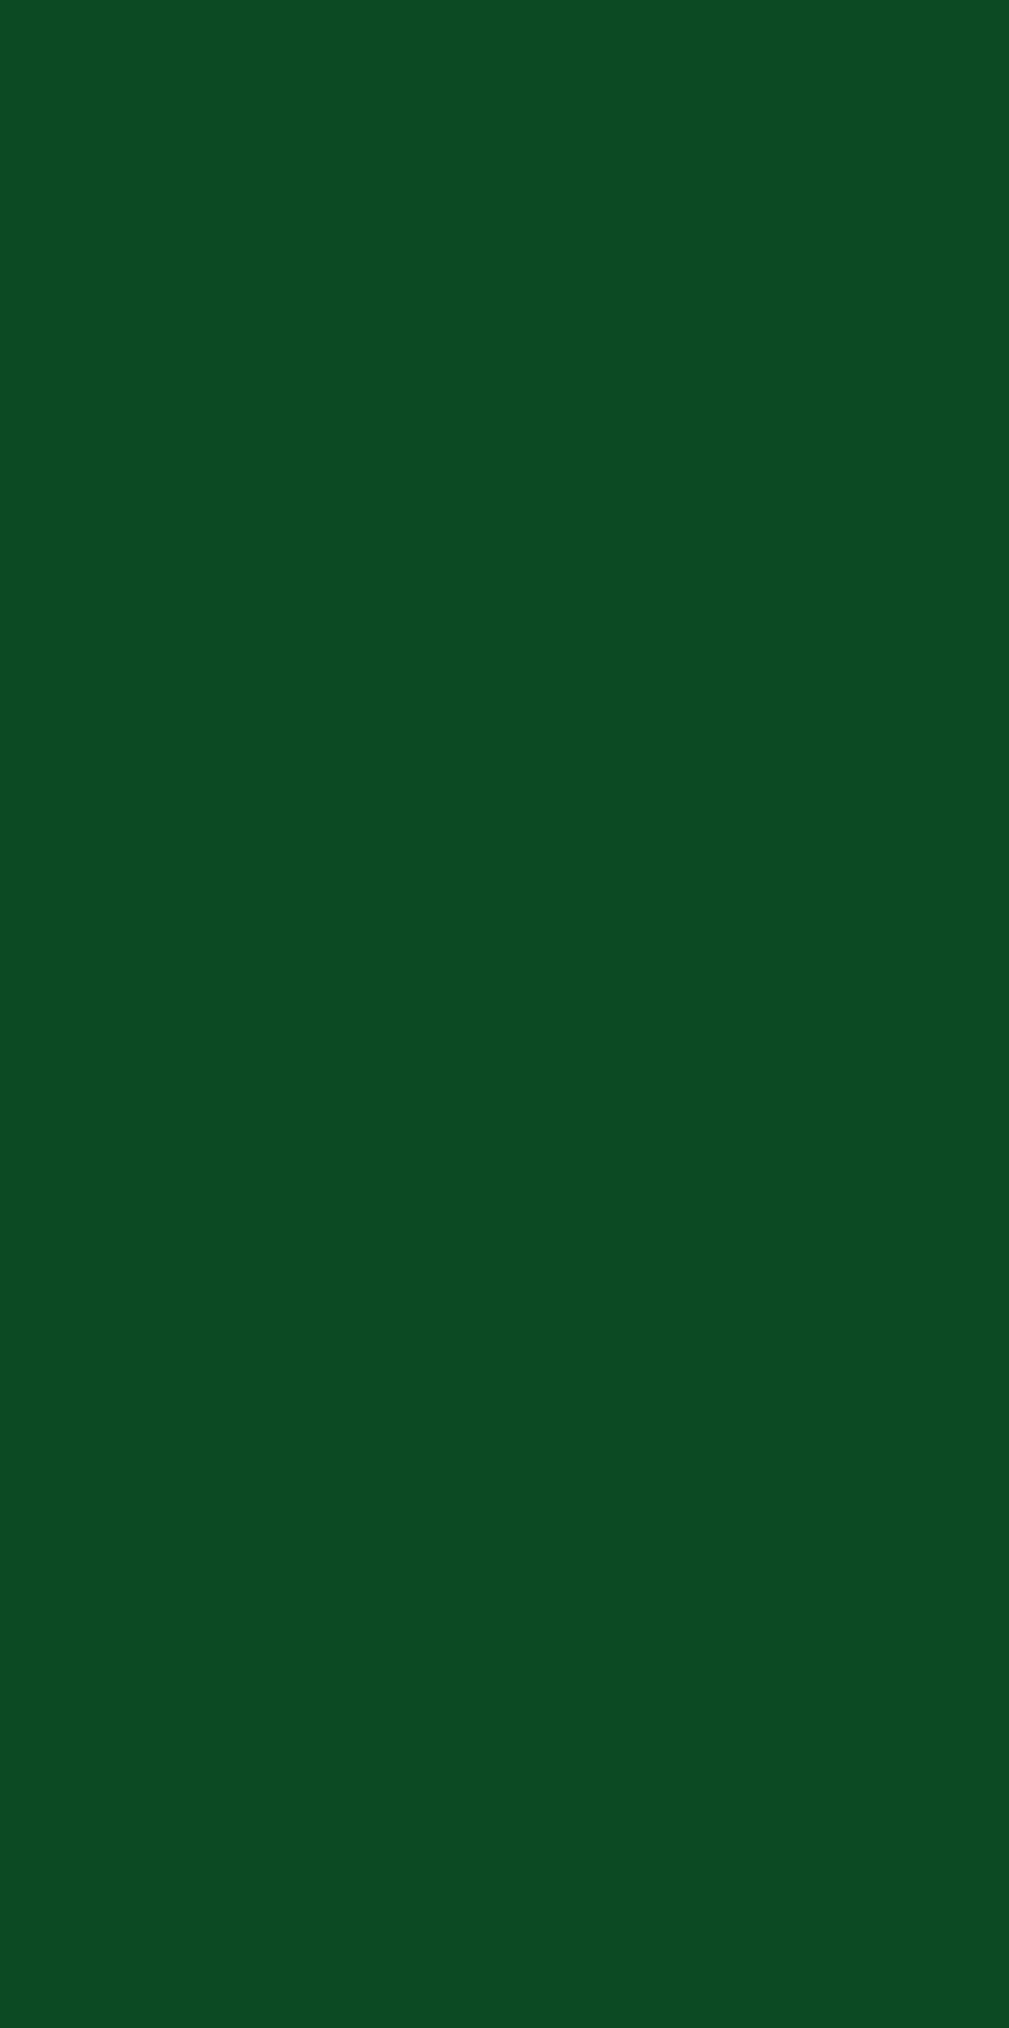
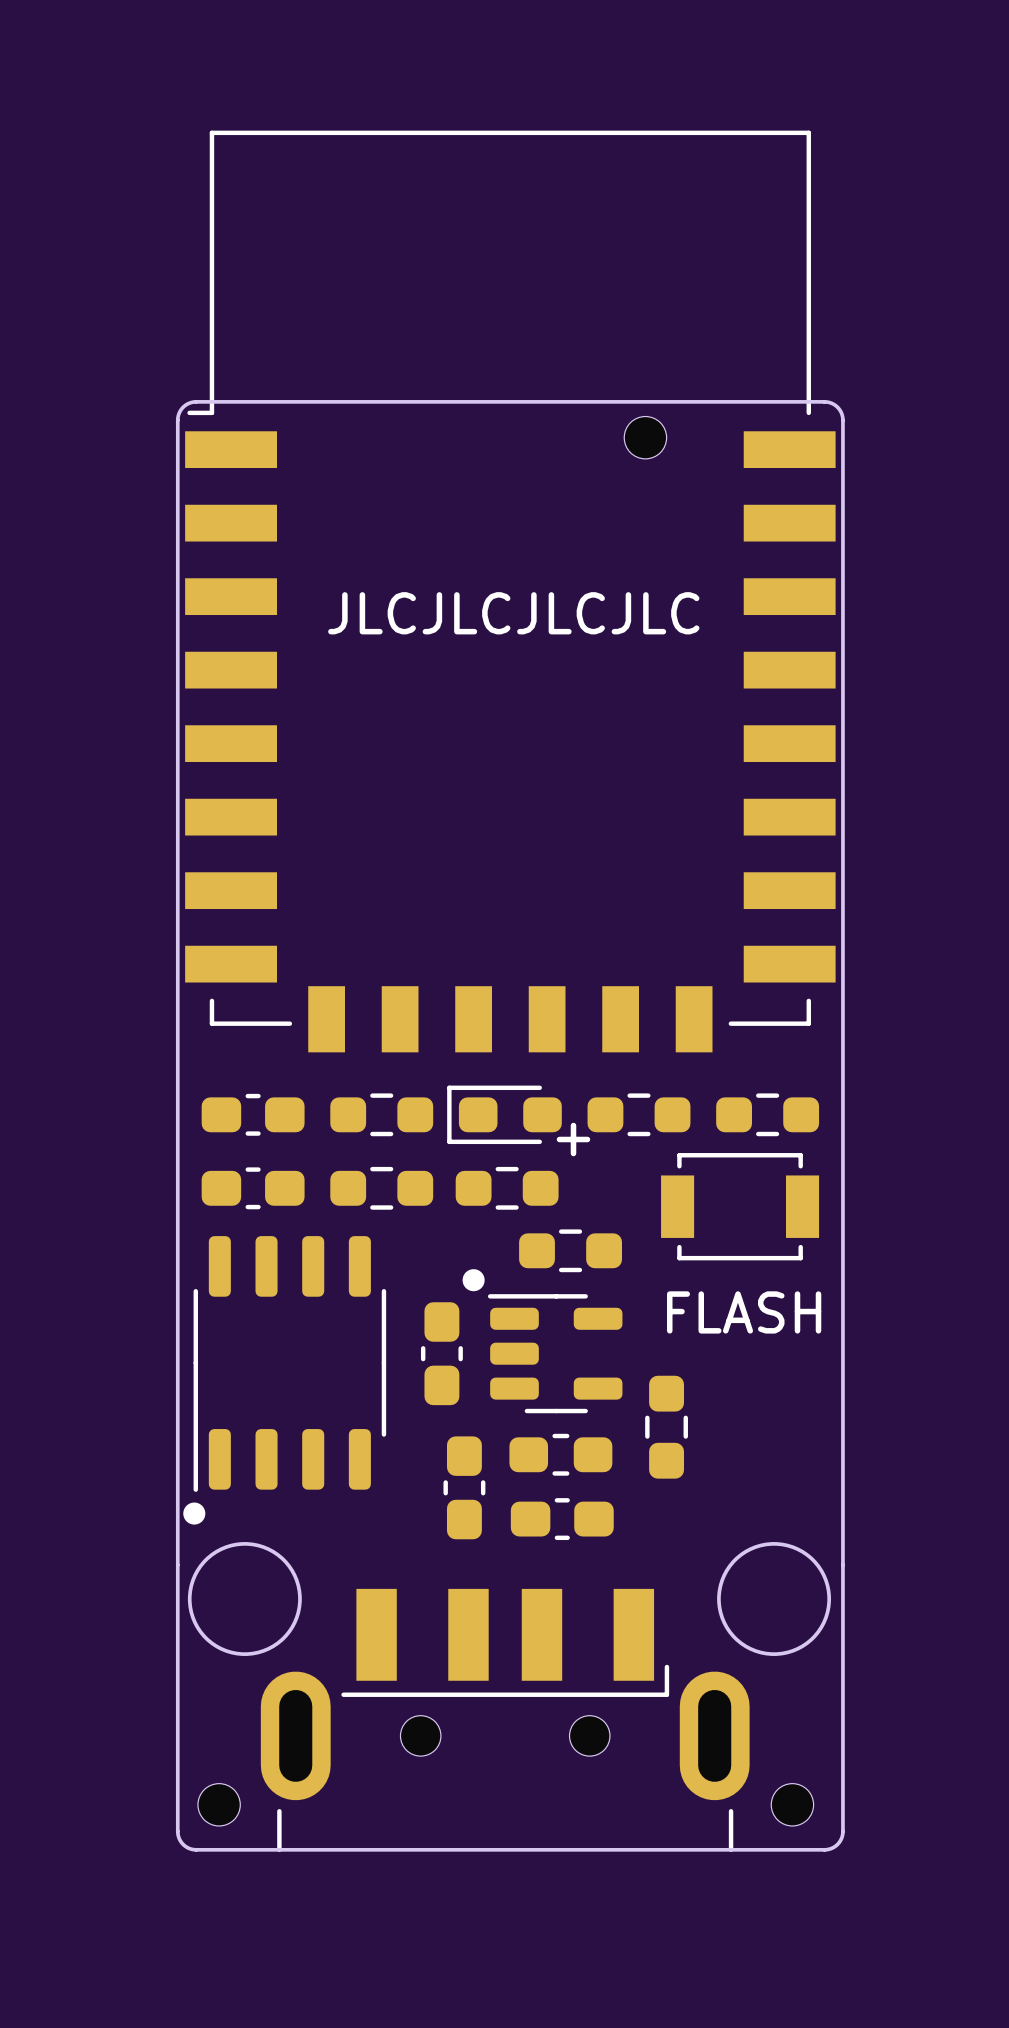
board edge: none -> (196, 401) (824, 401) (835, 405) (841, 413) (842, 1831) (839, 1842) (831, 1848) (196, 1849) (184, 1846) (179, 1838) (177, 420) (183, 407) (196, 401)
part: none -> (645, 437)
part: none -> (510, 591)
text: none -> JLCJLCJLCJLC (513, 613)
part: none -> (253, 1114)
part: none -> (381, 1114)
part: none -> (504, 1114)
part: none -> (638, 1114)
part: none -> (767, 1114)
text: none -> + (573, 1139)
part: none -> (253, 1188)
part: none -> (381, 1188)
part: none -> (507, 1188)
part: none -> (740, 1206)
part: none -> (570, 1250)
drawing: none -> [462, 1269, 485, 1292]
text: none -> FLASH (744, 1312)
part: none -> (441, 1353)
part: none -> (555, 1353)
part: none -> (289, 1363)
part: none -> (666, 1427)
part: none -> (560, 1454)
part: none -> (464, 1487)
drawing: none -> [183, 1502, 206, 1525]
part: none -> (562, 1519)
round board edge: none -> [187, 1542, 302, 1656]
round board edge: none -> [717, 1542, 832, 1656]
part: none -> (505, 1720)
part: none -> (219, 1804)
part: none -> (792, 1804)

